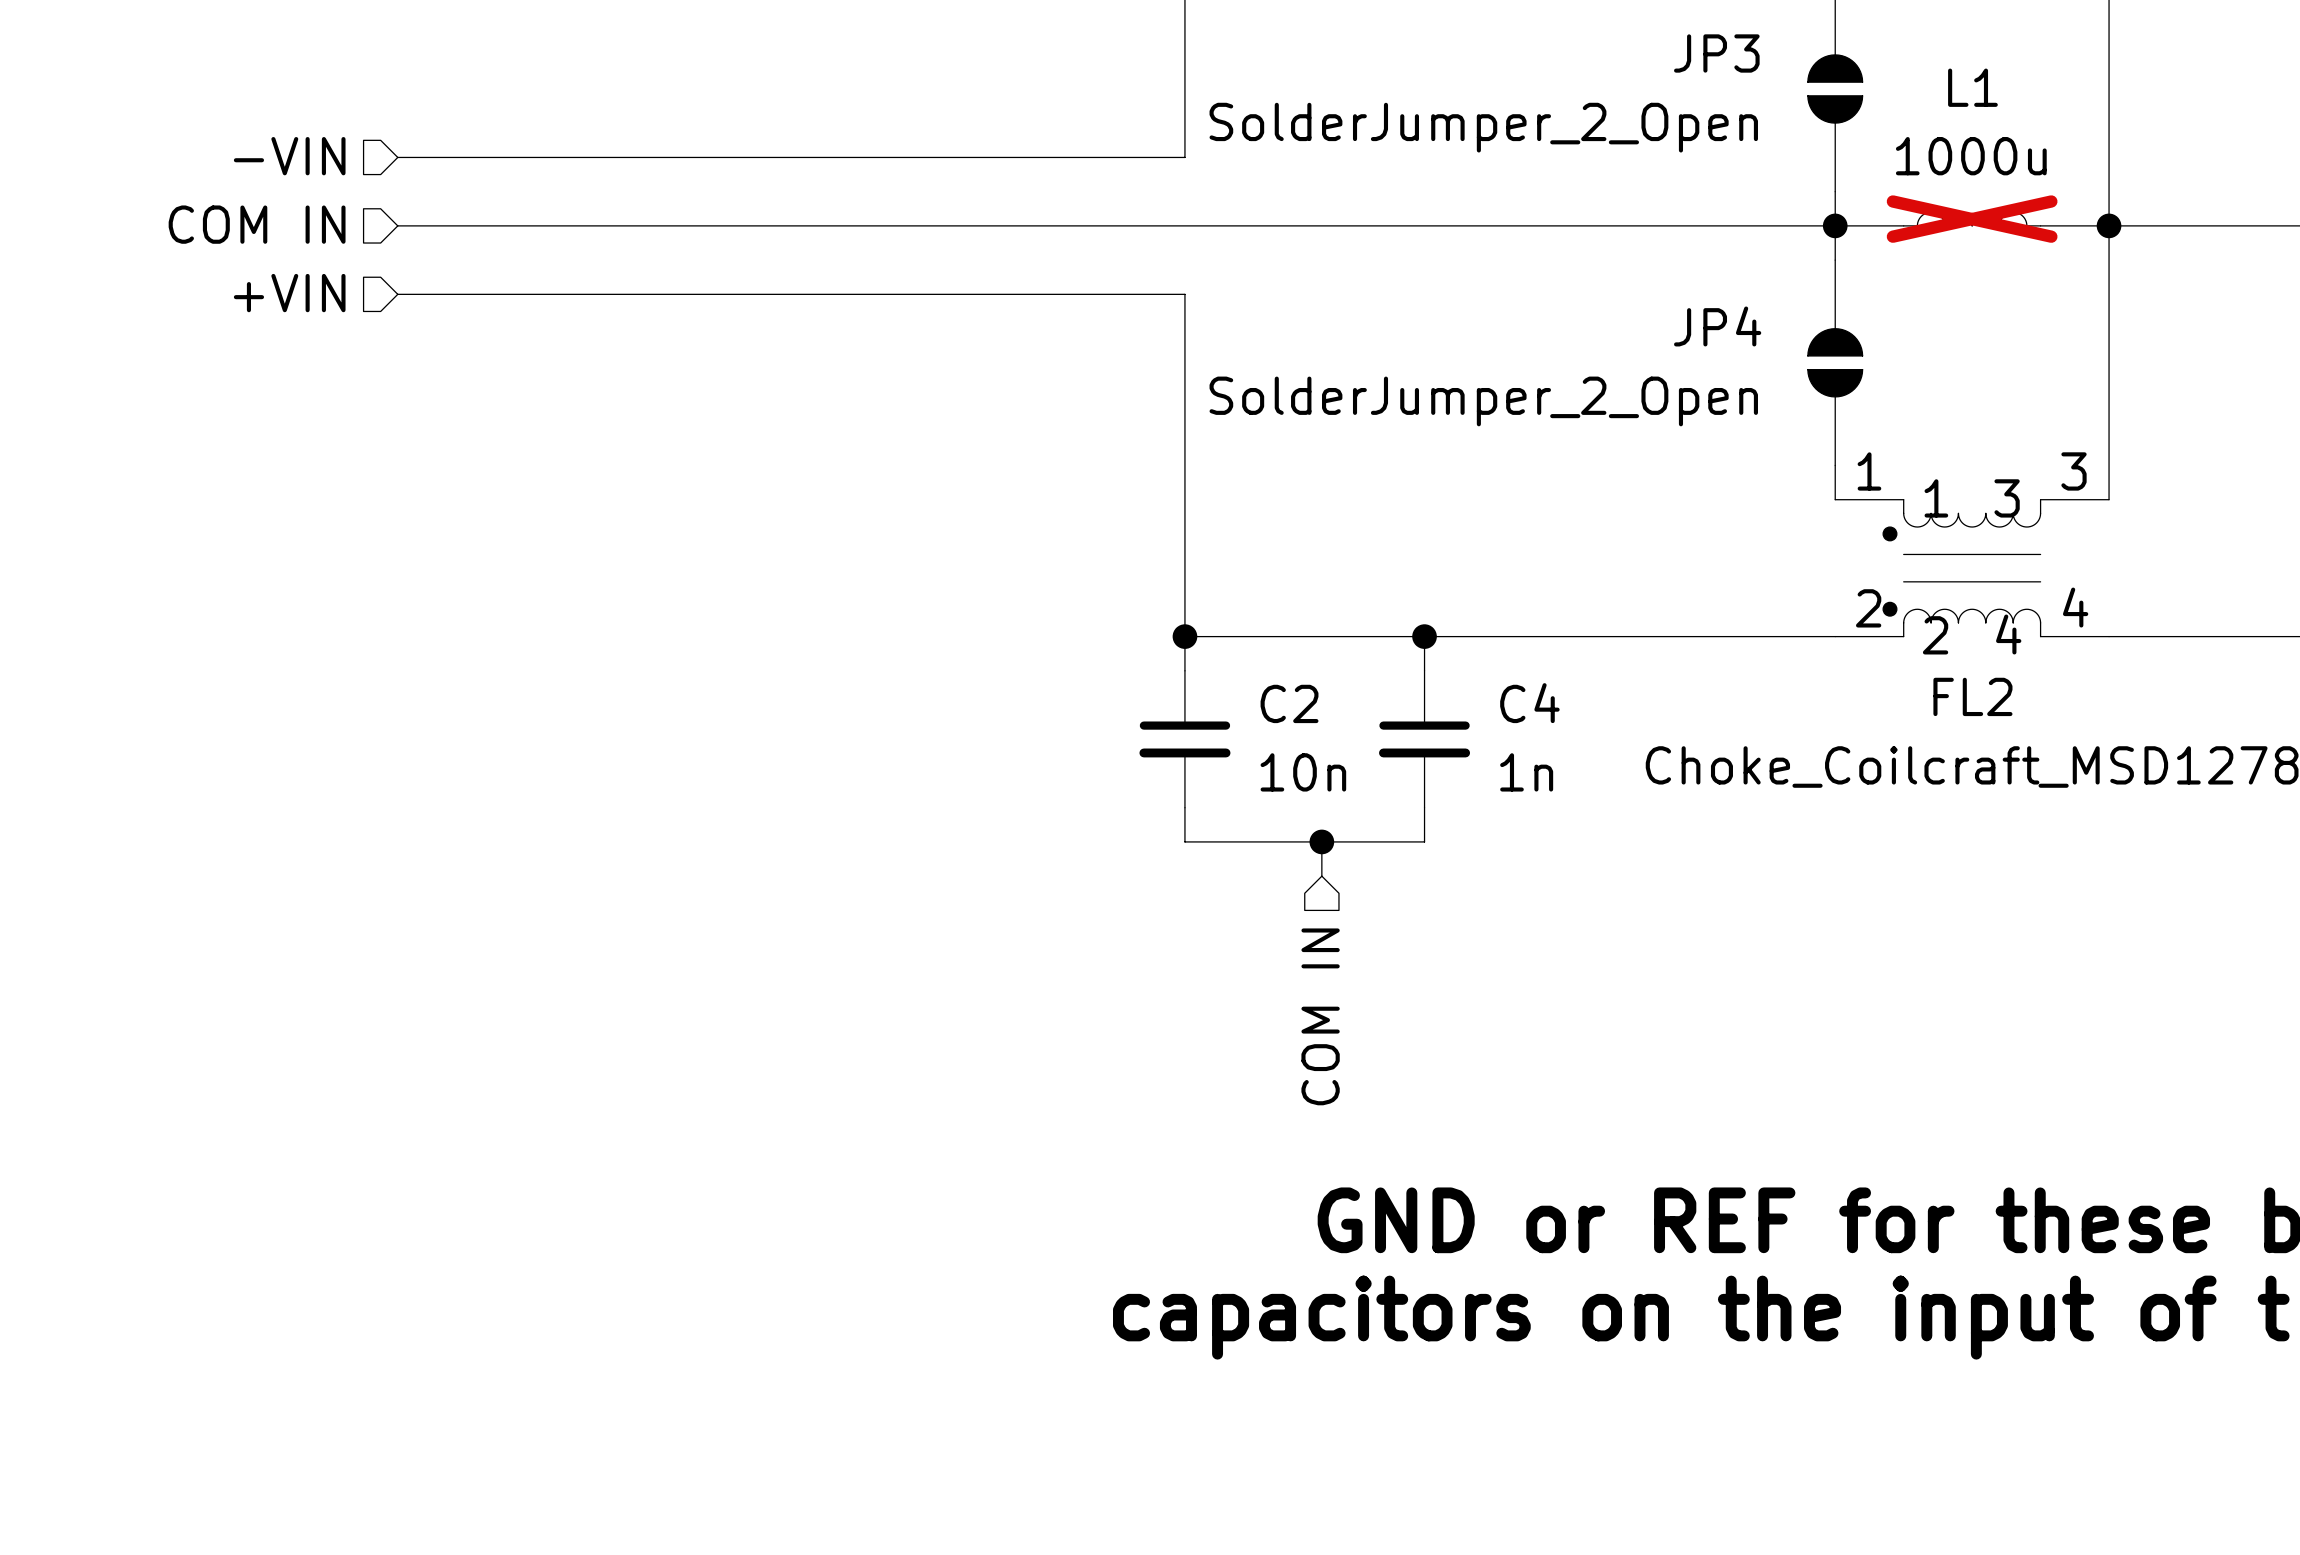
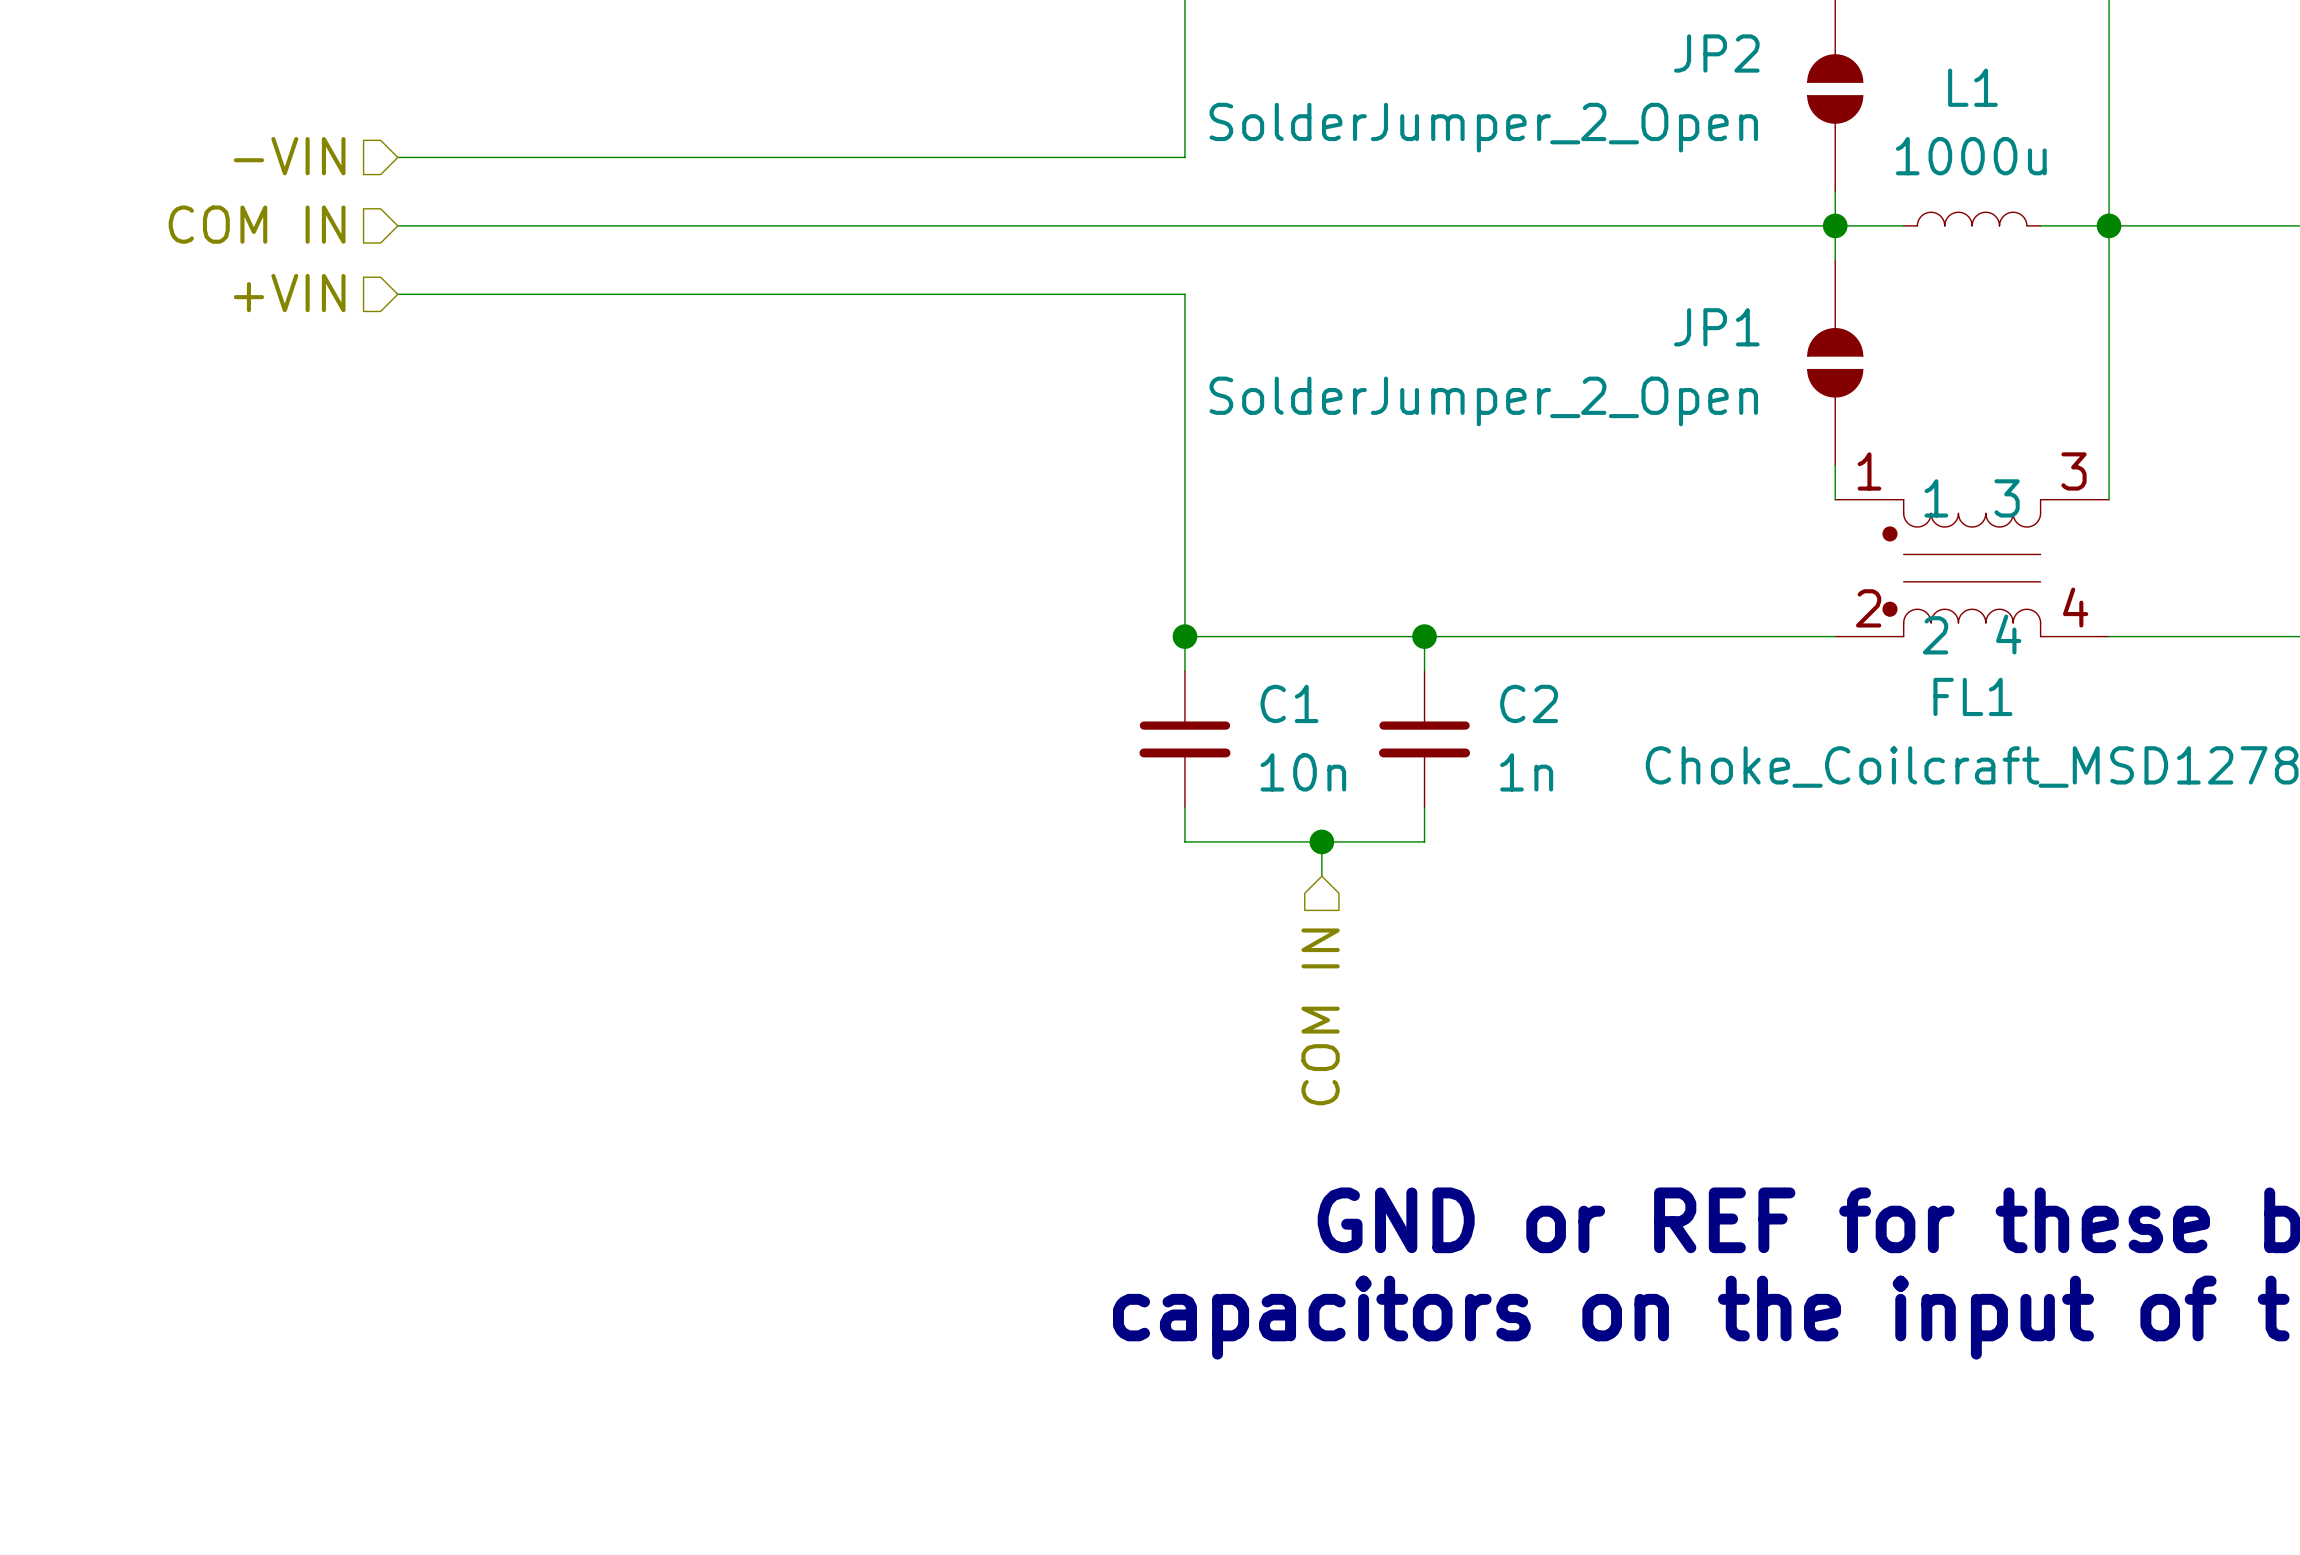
JP3 name: JP3 (1716, 53) -> JP2 (1716, 53)
L1 do-not-place cross: (1972, 219) -> none
JP4 name: JP4 (1717, 326) -> JP1 (1716, 327)
FL2 name: FL2 (1972, 696) -> FL1 (1972, 696)
C2 name: C2 (1289, 703) -> C1 (1289, 703)
C4 name: C4 (1529, 703) -> C2 (1529, 703)

